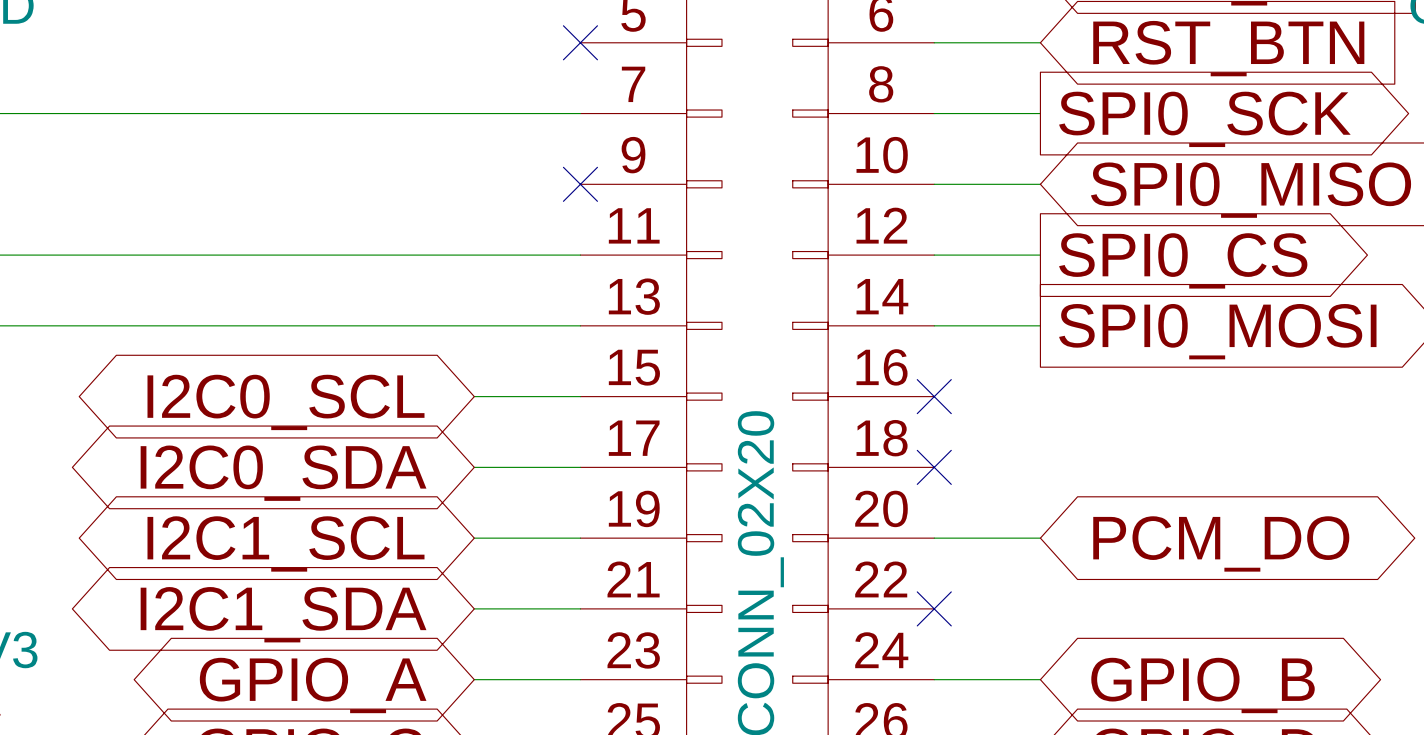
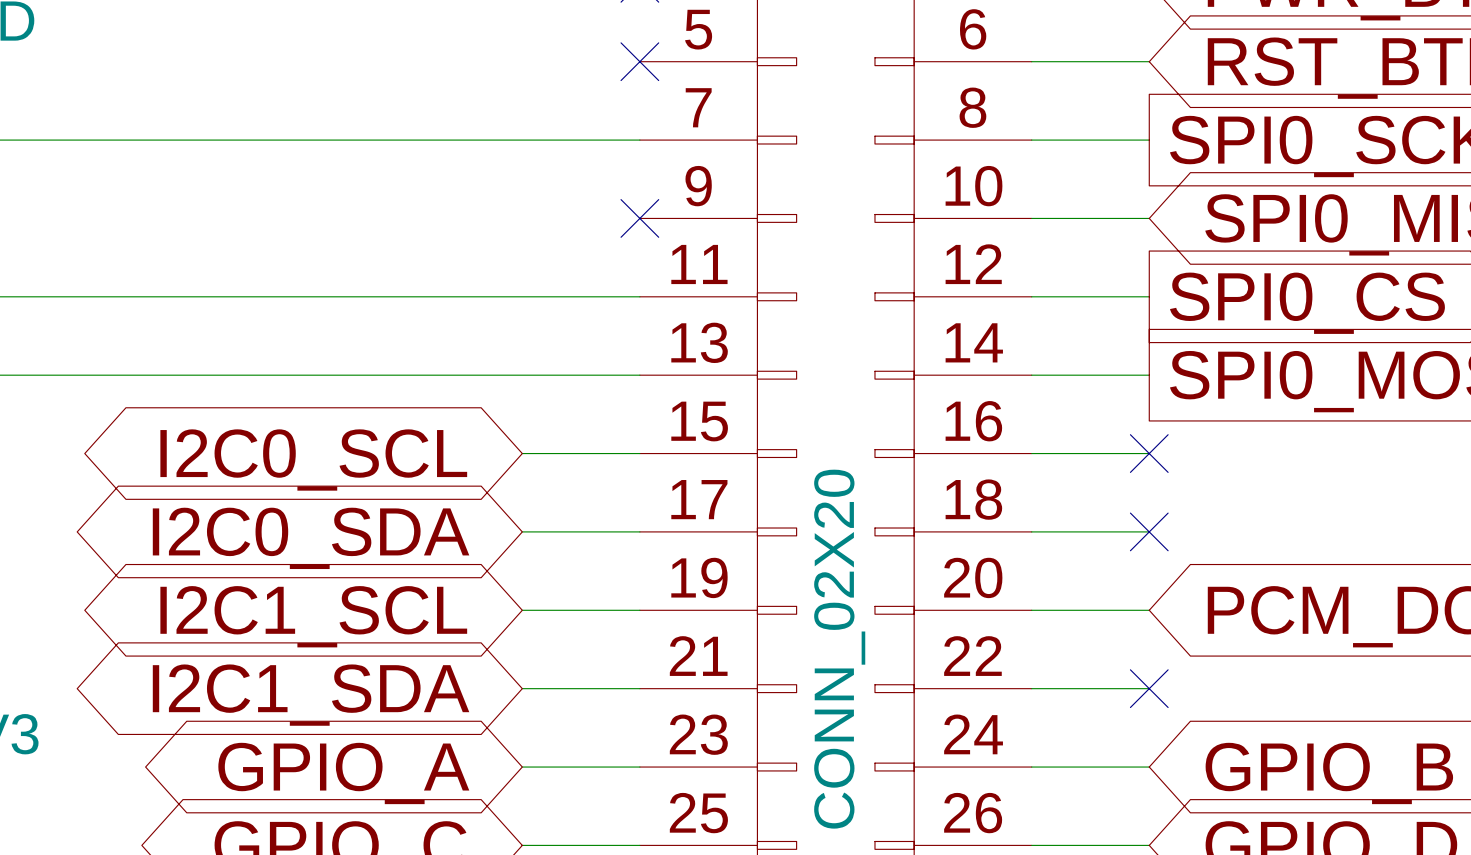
wire: none -> (1031, 453) (1149, 453)
no-connect mark: (934, 396) -> none
no-connect mark: none -> (1149, 453)
wire: none -> (1031, 531) (1149, 531)
no-connect mark: (934, 467) -> none
no-connect mark: none -> (1149, 531)
wire: none -> (1031, 688) (1149, 688)
no-connect mark: (934, 608) -> none
no-connect mark: none -> (1149, 688)

